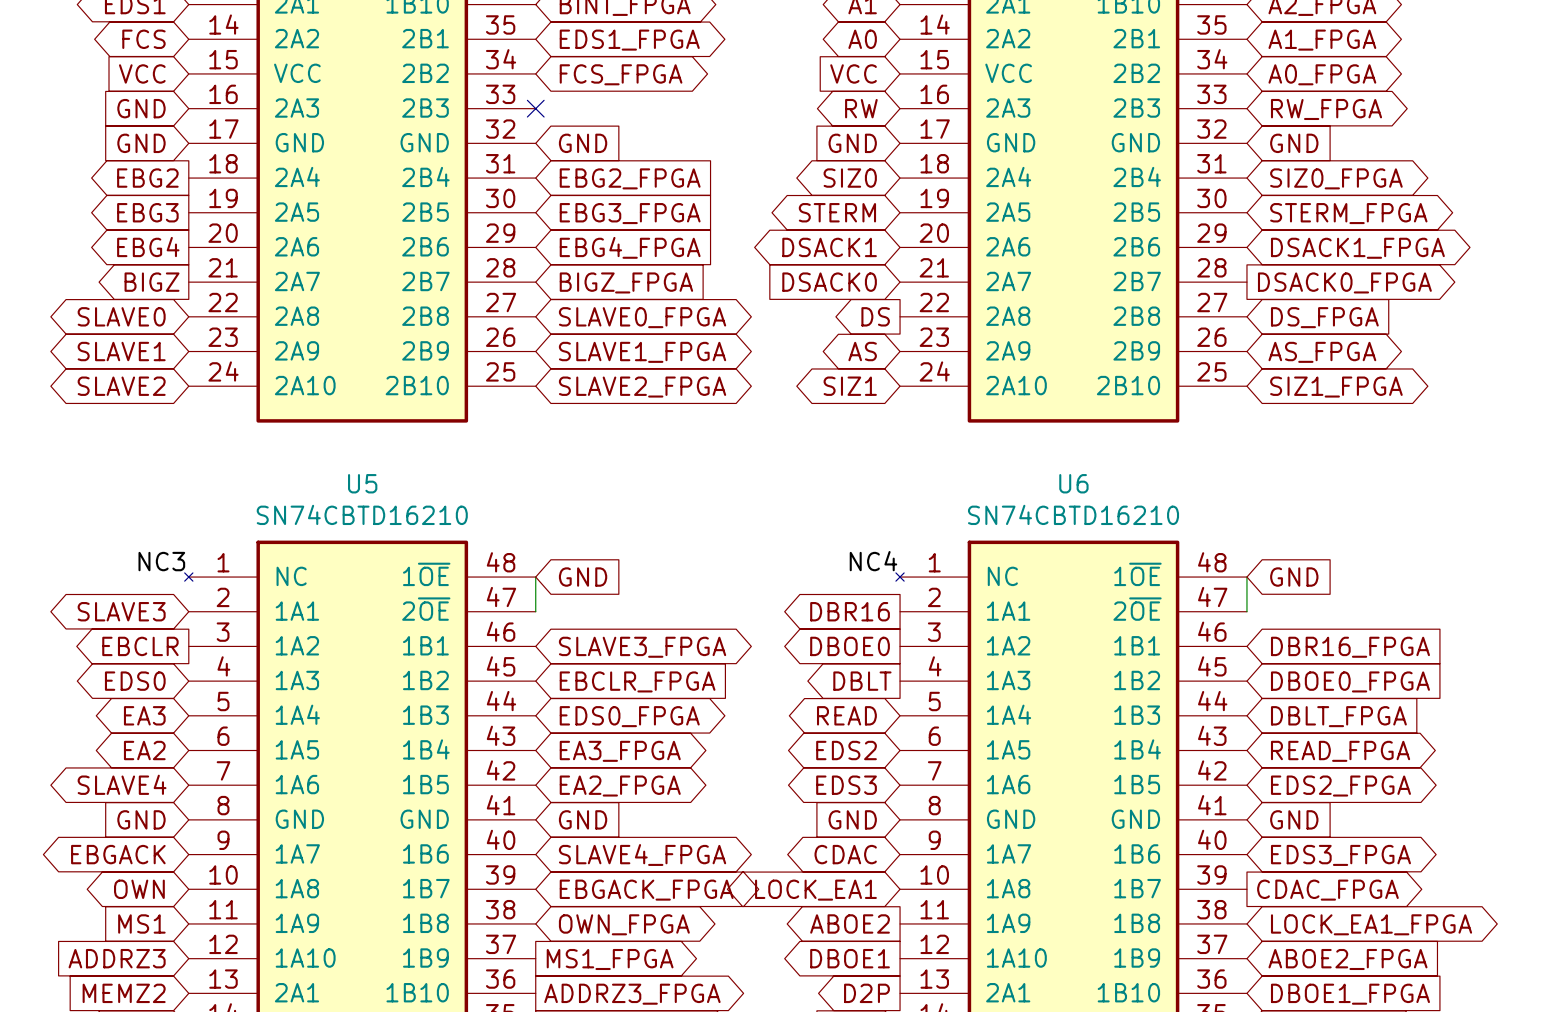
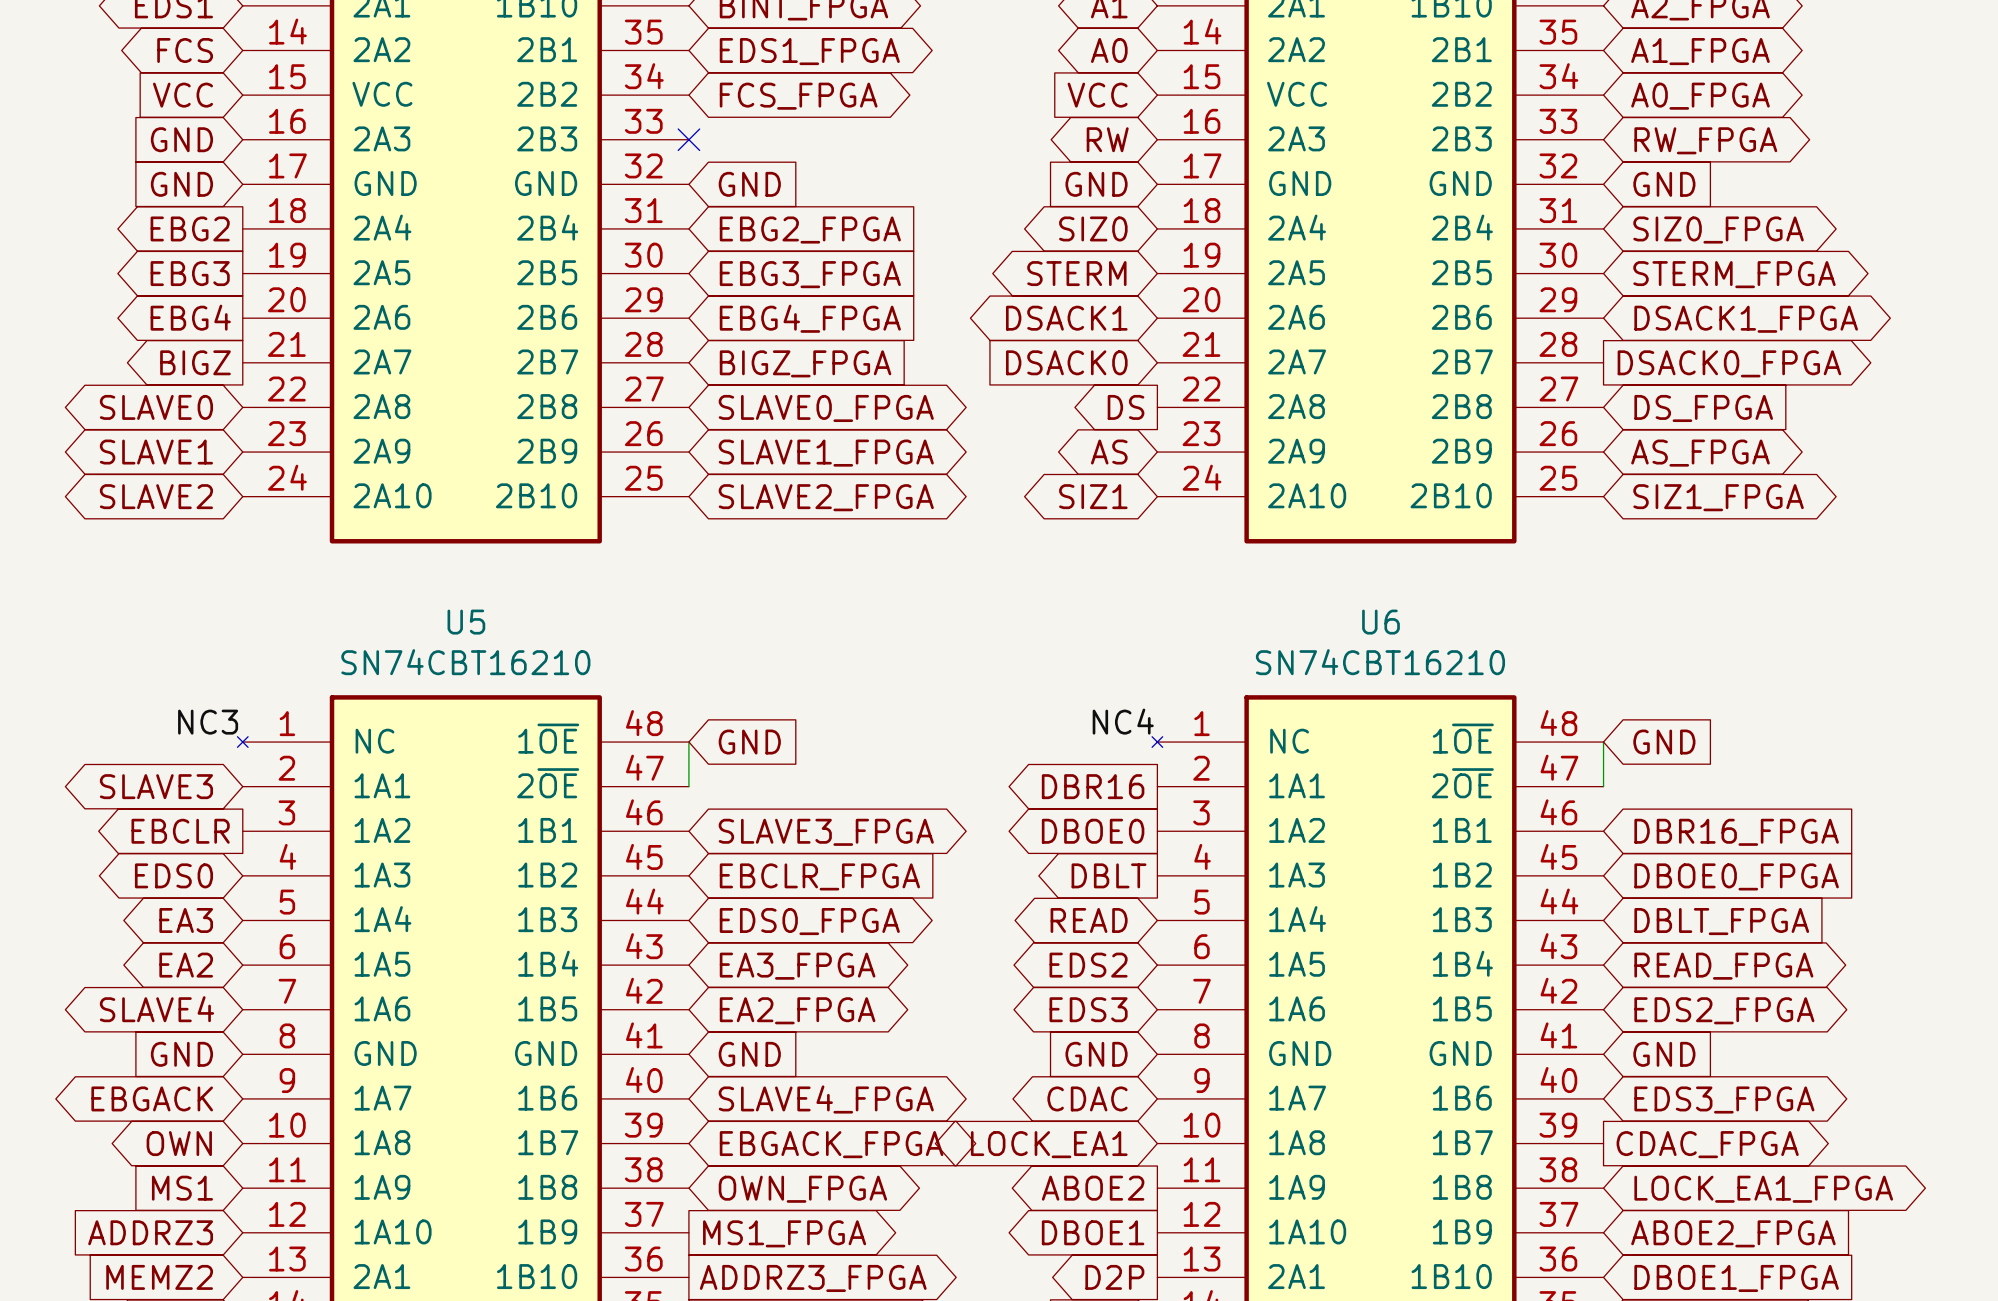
U5 value: SN74CBTD16210 (362, 514) -> SN74CBT16210 (465, 662)
U6 value: SN74CBTD16210 (1073, 514) -> SN74CBT16210 (1380, 662)

